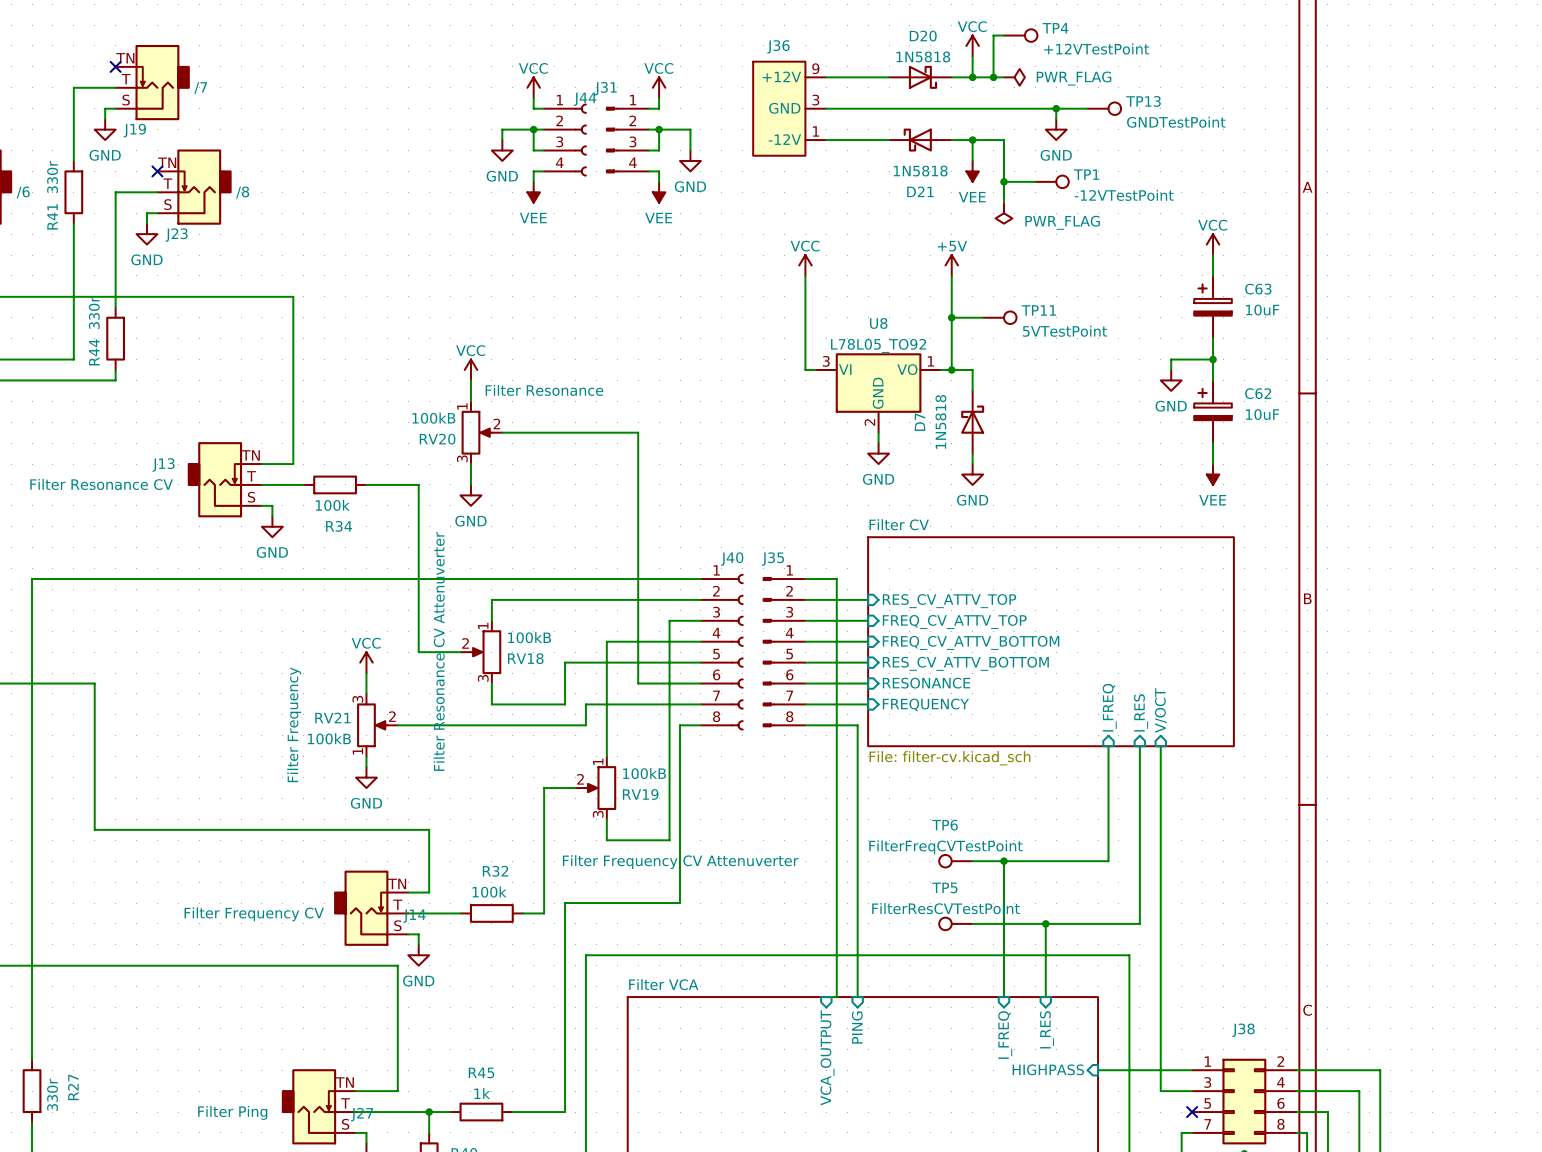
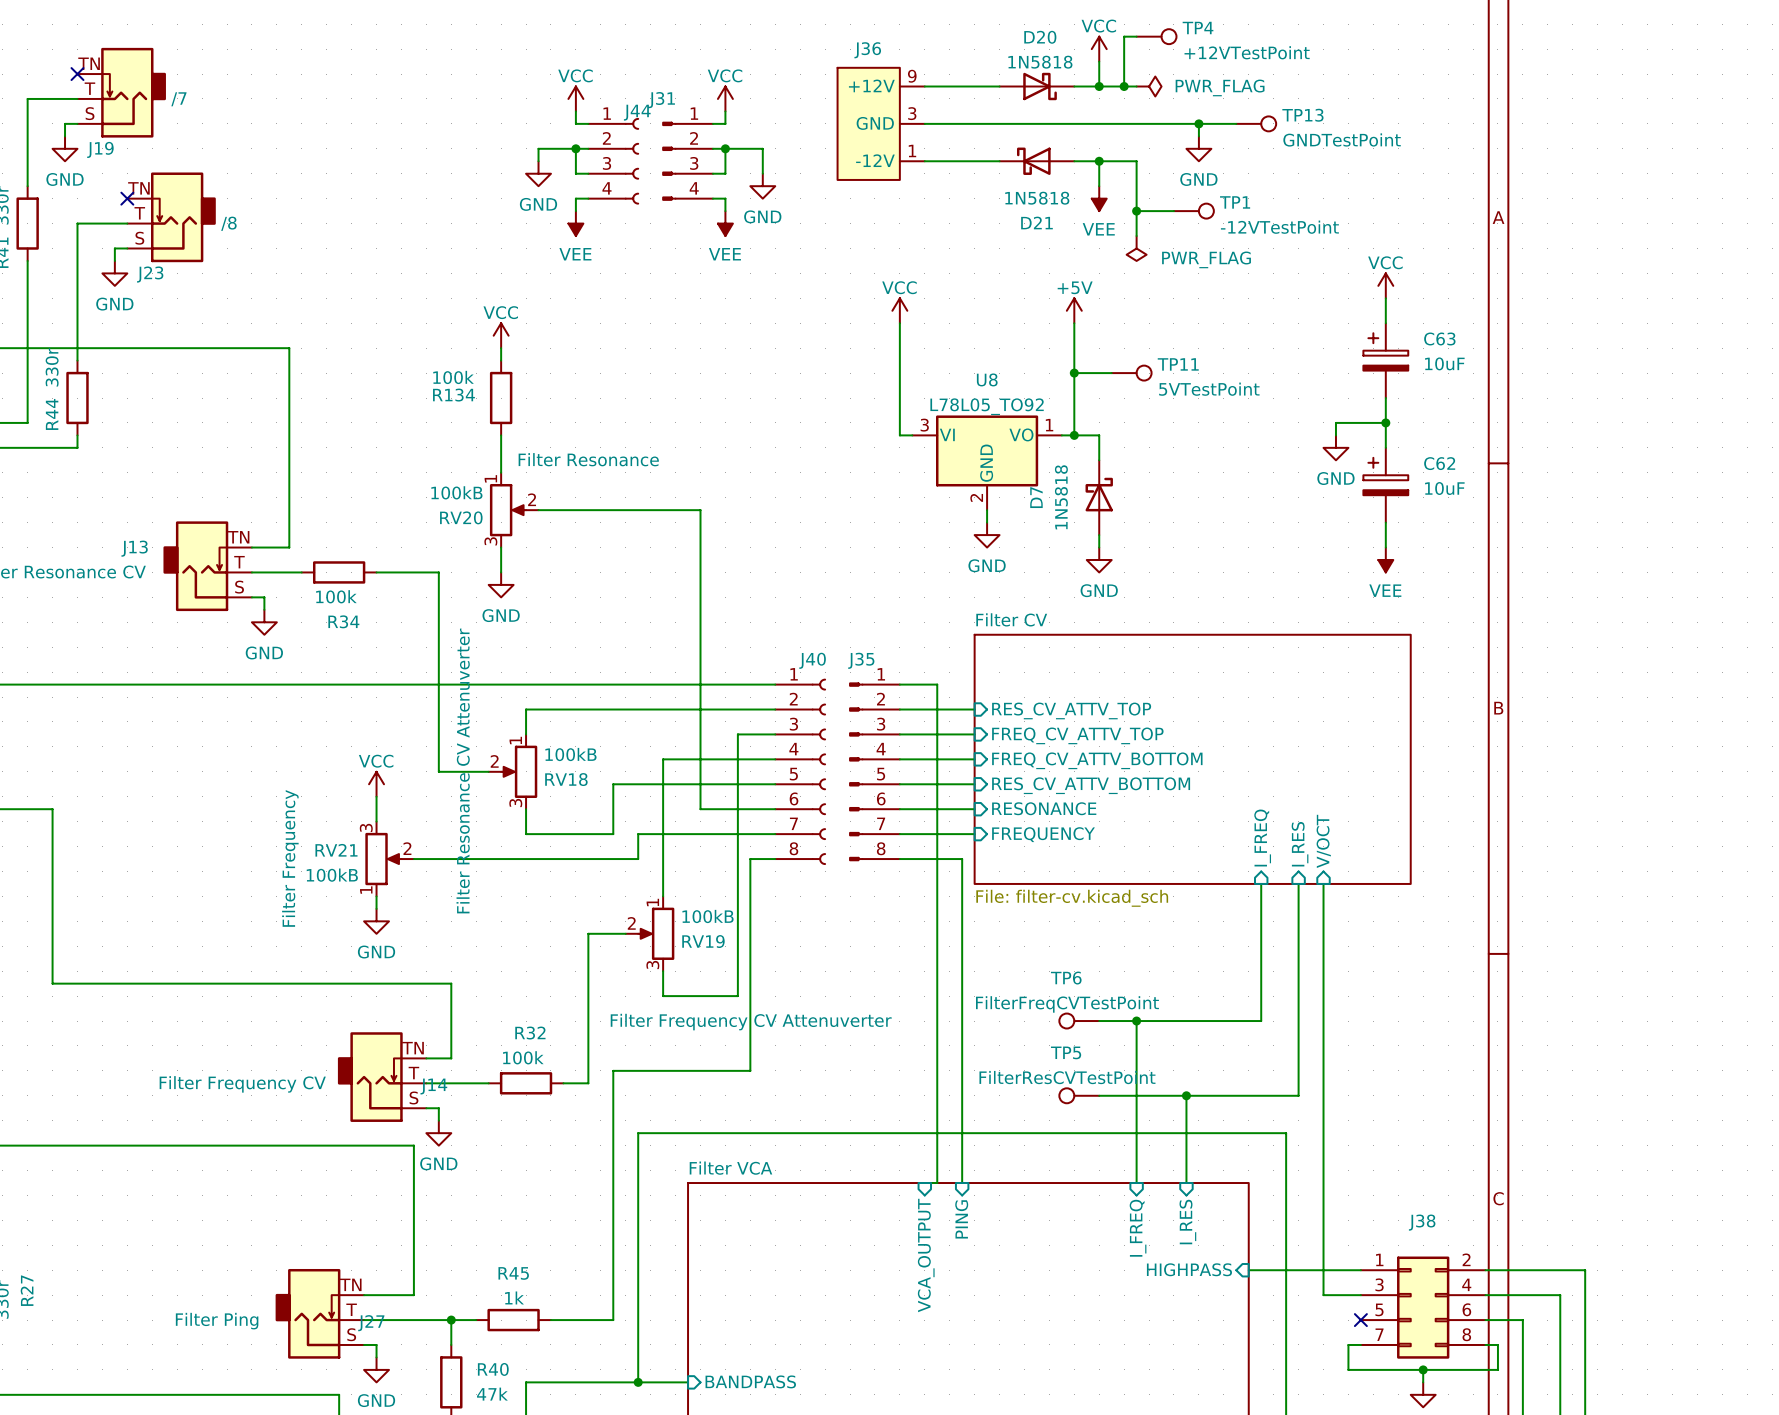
wire: none -> (501, 348) (501, 360)
R134: none -> 100k (501, 398)
power symbol position: VCC (470, 369) -> VCC (501, 335)

